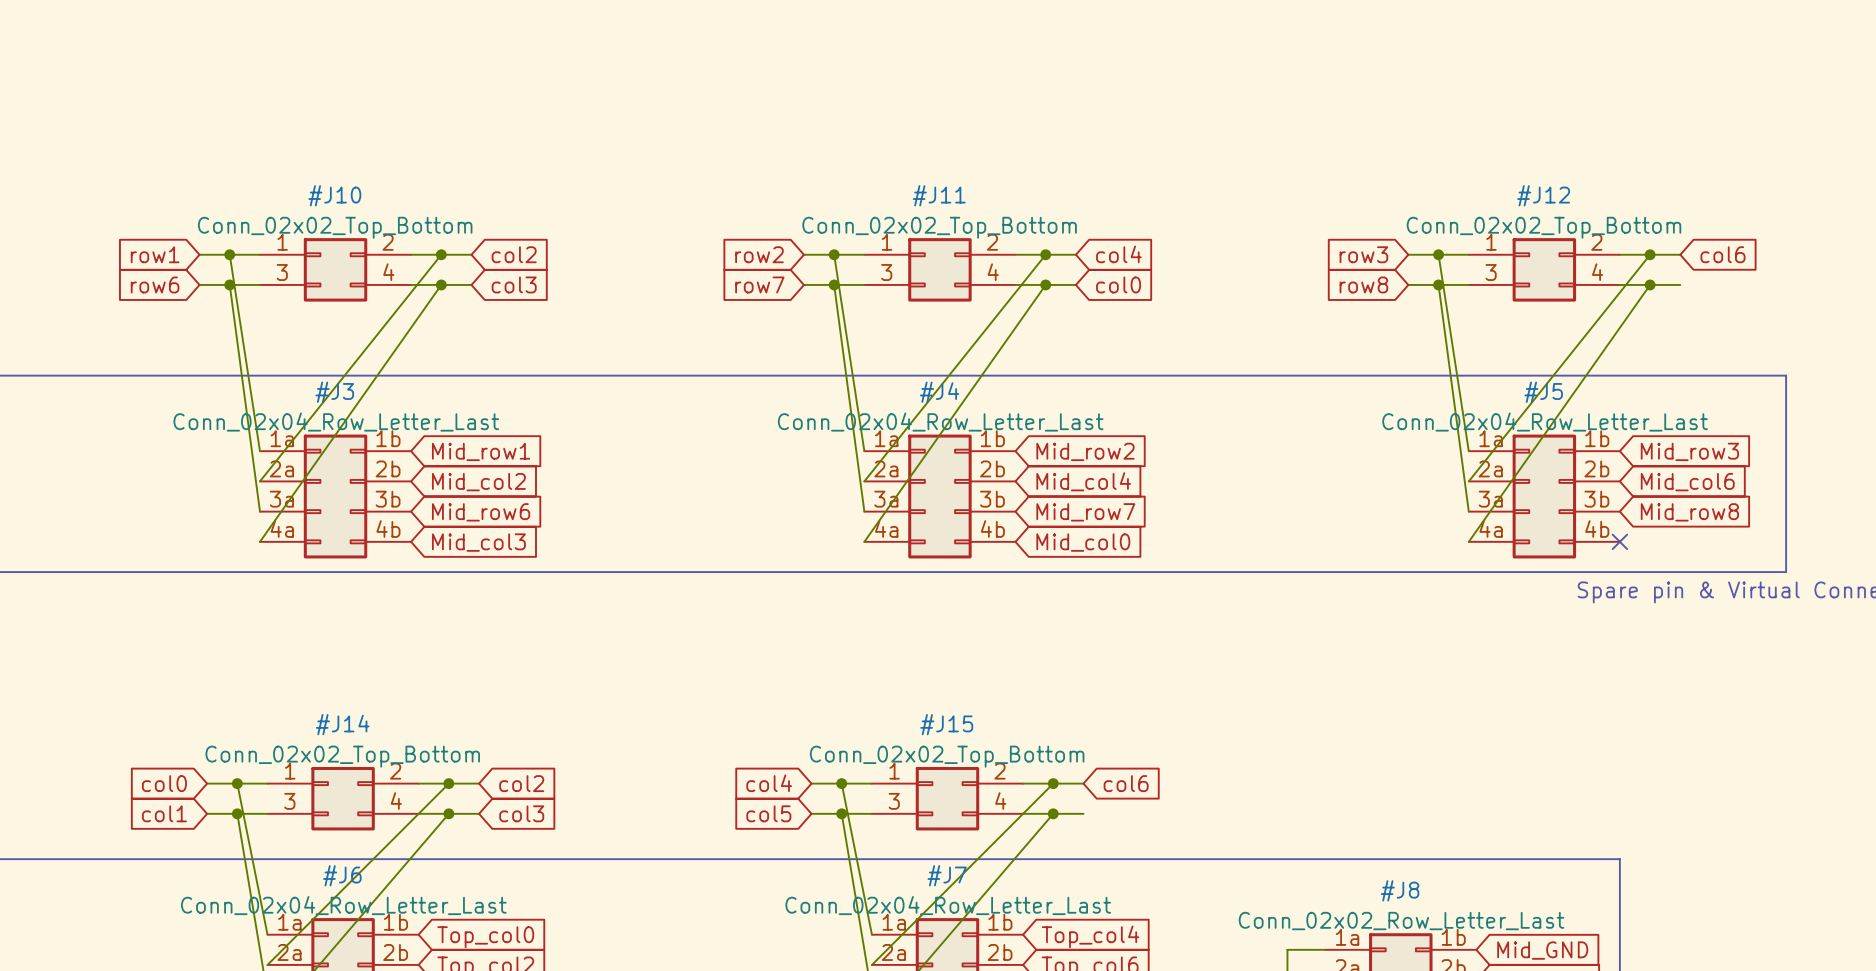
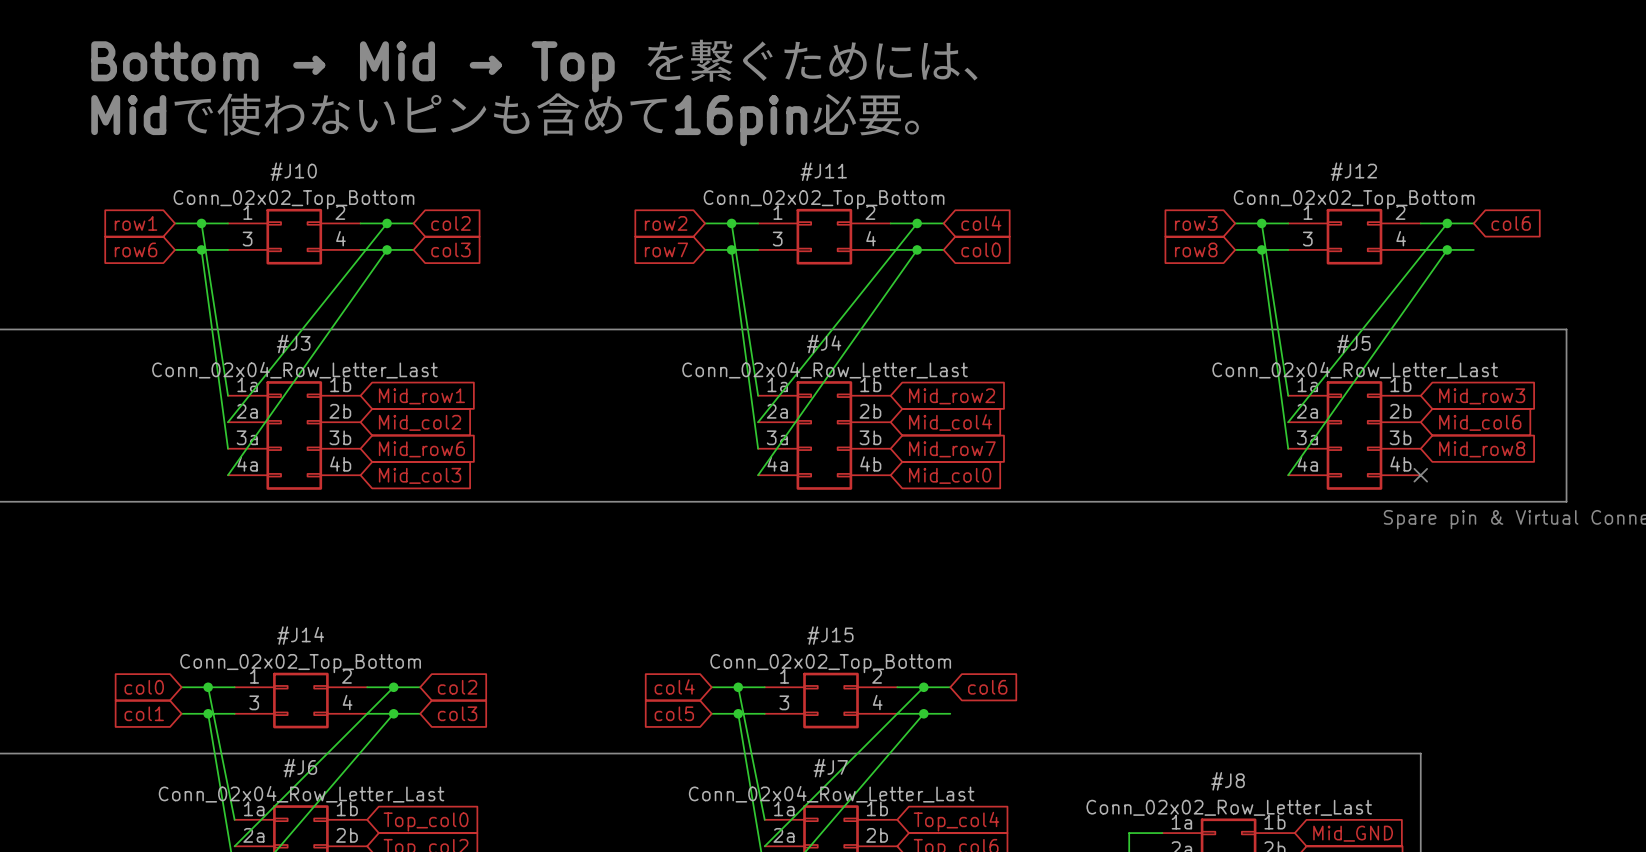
text: none -> Bottom → Mid → Top を繋ぐためには、 (536, 64)
text: none -> Midで使わないピンも含めて16pin必要。 (506, 118)

